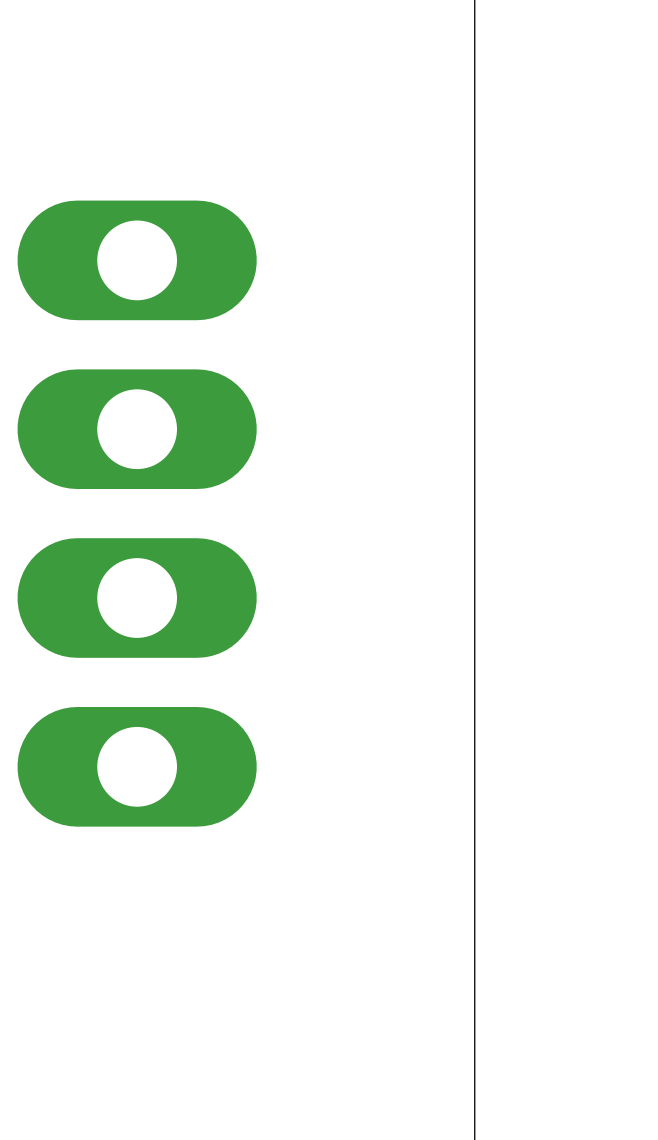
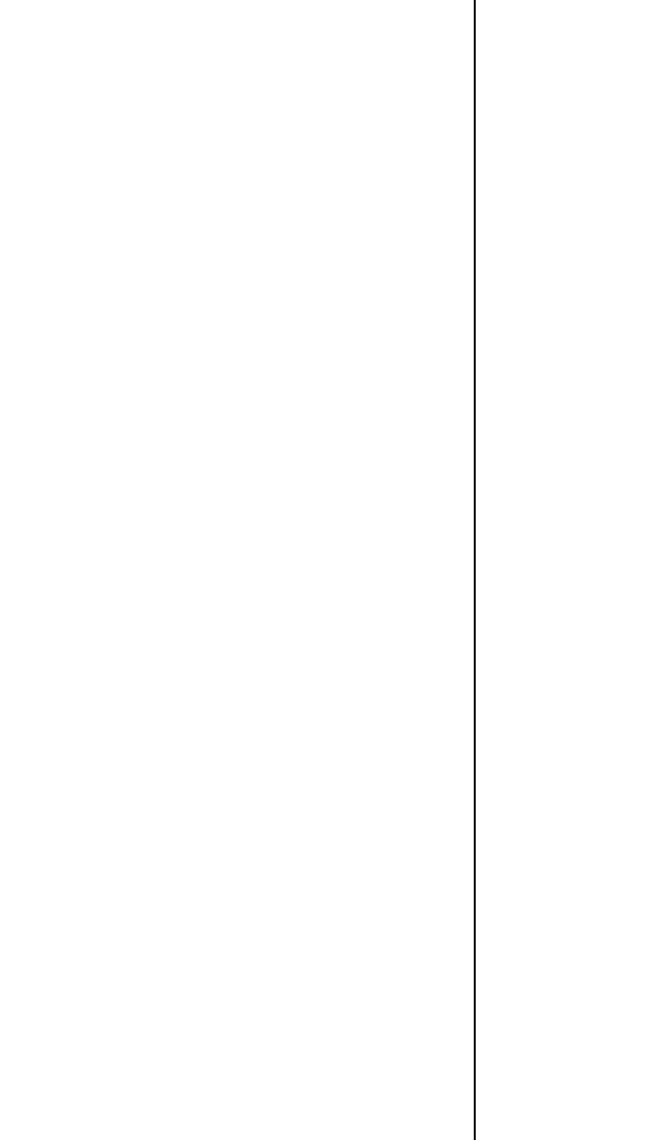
part: (137, 513) -> none

